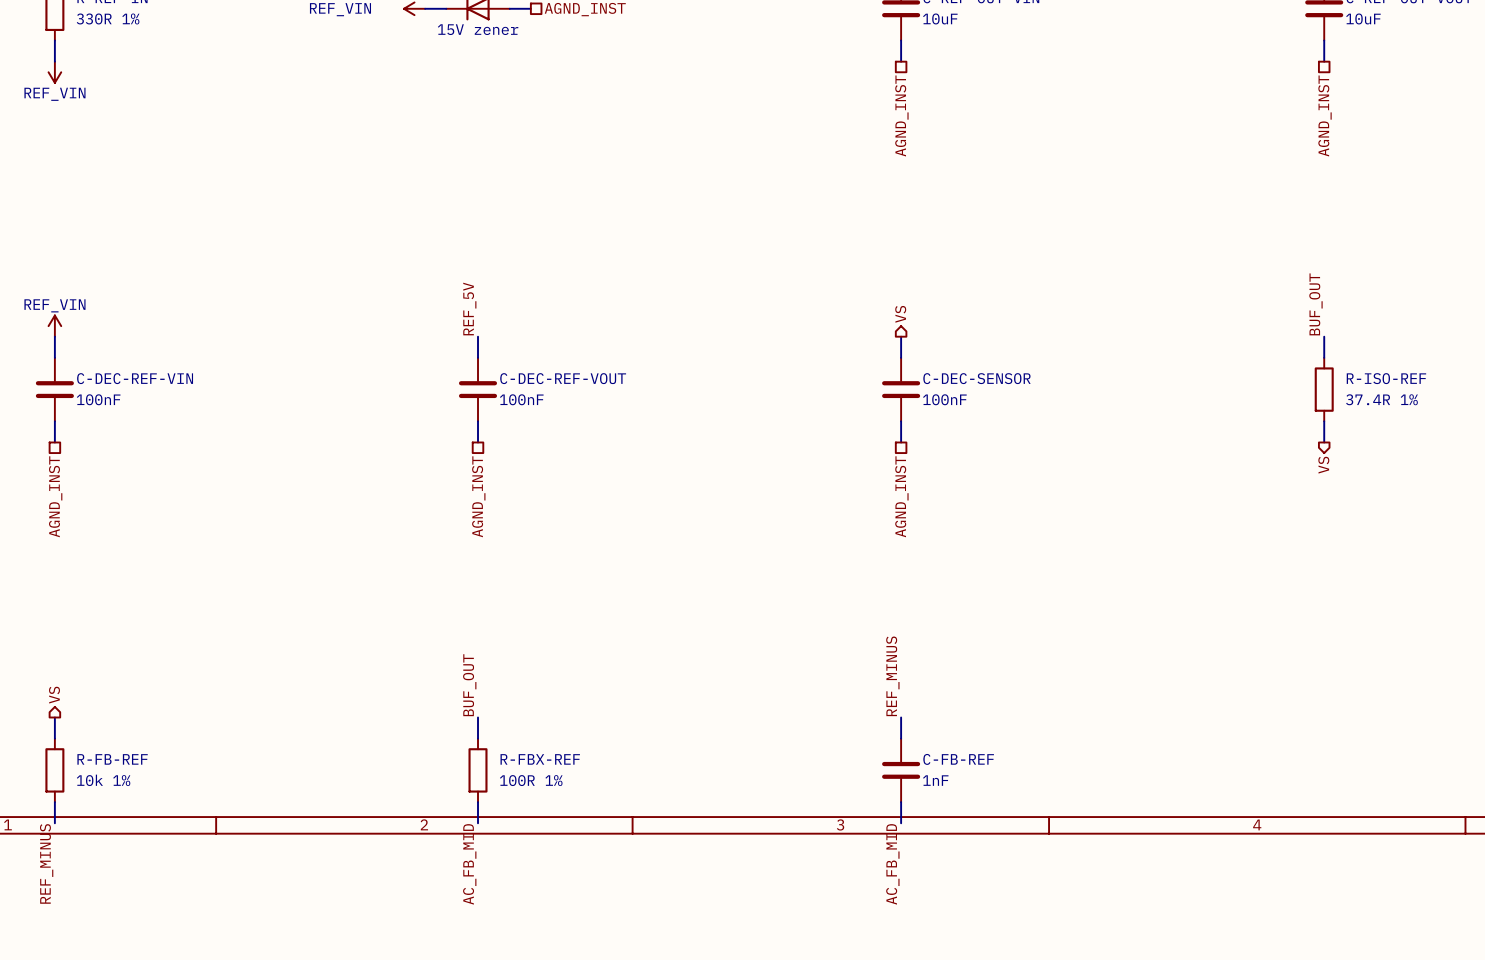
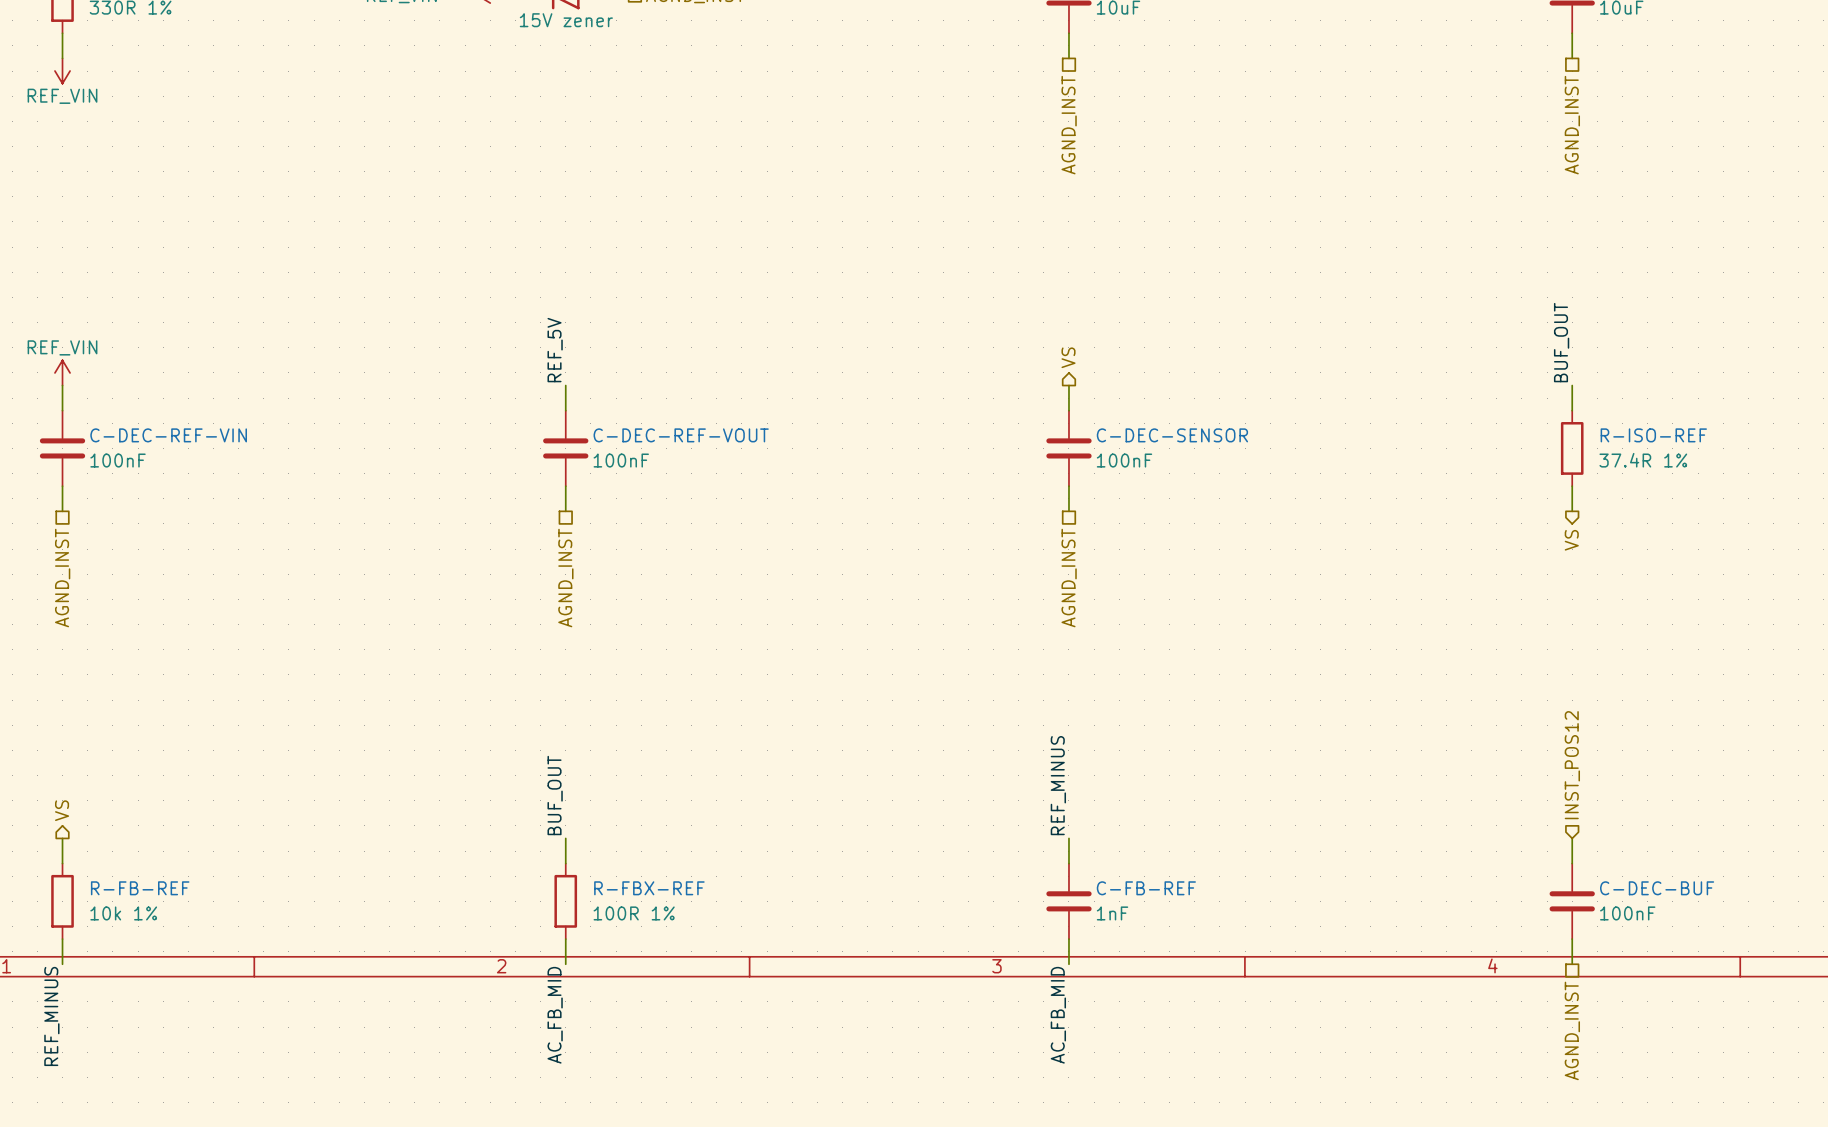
hierarchical label: none -> INST_POS12 (1572, 765)
wire: none -> (1572, 838) (1572, 863)
C-DEC-BUF: none -> 100nF (1572, 901)
wire: none -> (1572, 939) (1572, 964)
hierarchical label: none -> AGND_INST (1572, 1030)

